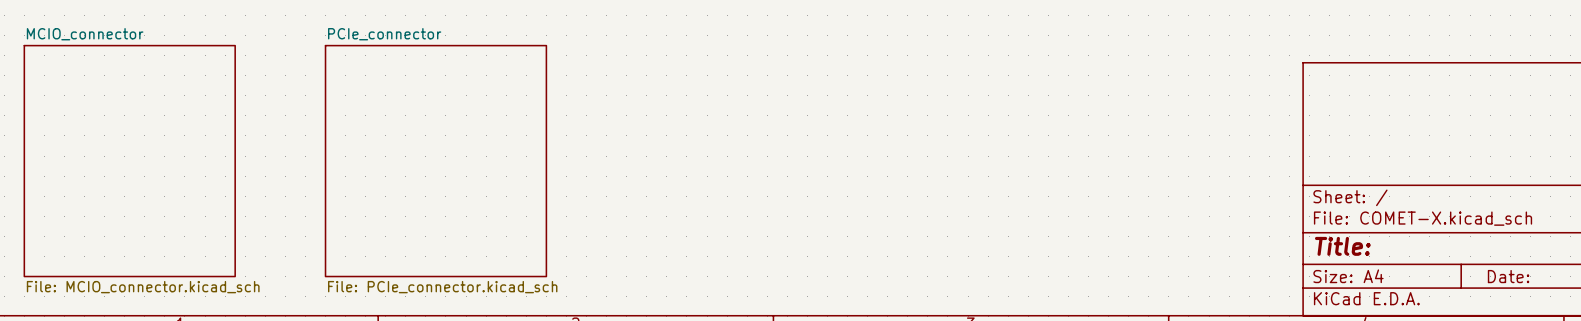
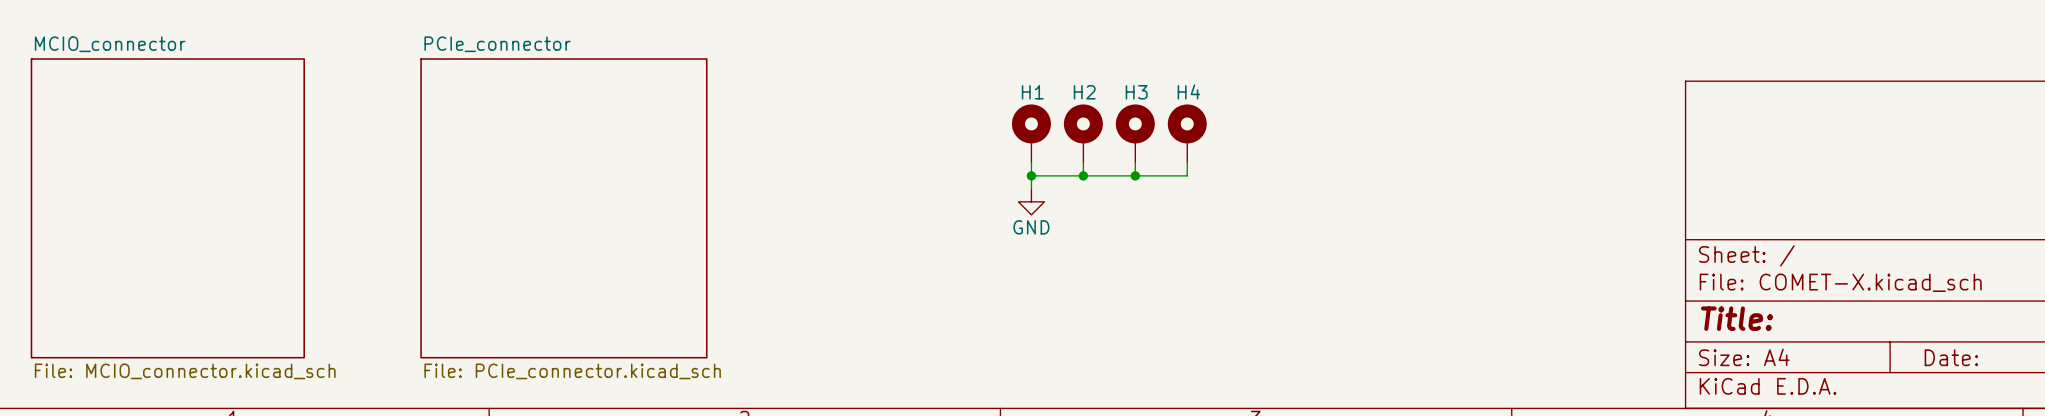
H1: none -> (1031, 133)
H2: none -> (1083, 133)
H3: none -> (1135, 133)
H4: none -> (1187, 133)
wire: none -> (1031, 162) (1031, 188)
wire: none -> (1083, 162) (1083, 175)
wire: none -> (1135, 162) (1135, 175)
wire: none -> (1187, 162) (1187, 175) (1031, 175)
junction: none -> (1031, 175)
junction: none -> (1083, 175)
junction: none -> (1135, 175)
power symbol: none -> GND (1031, 201)

